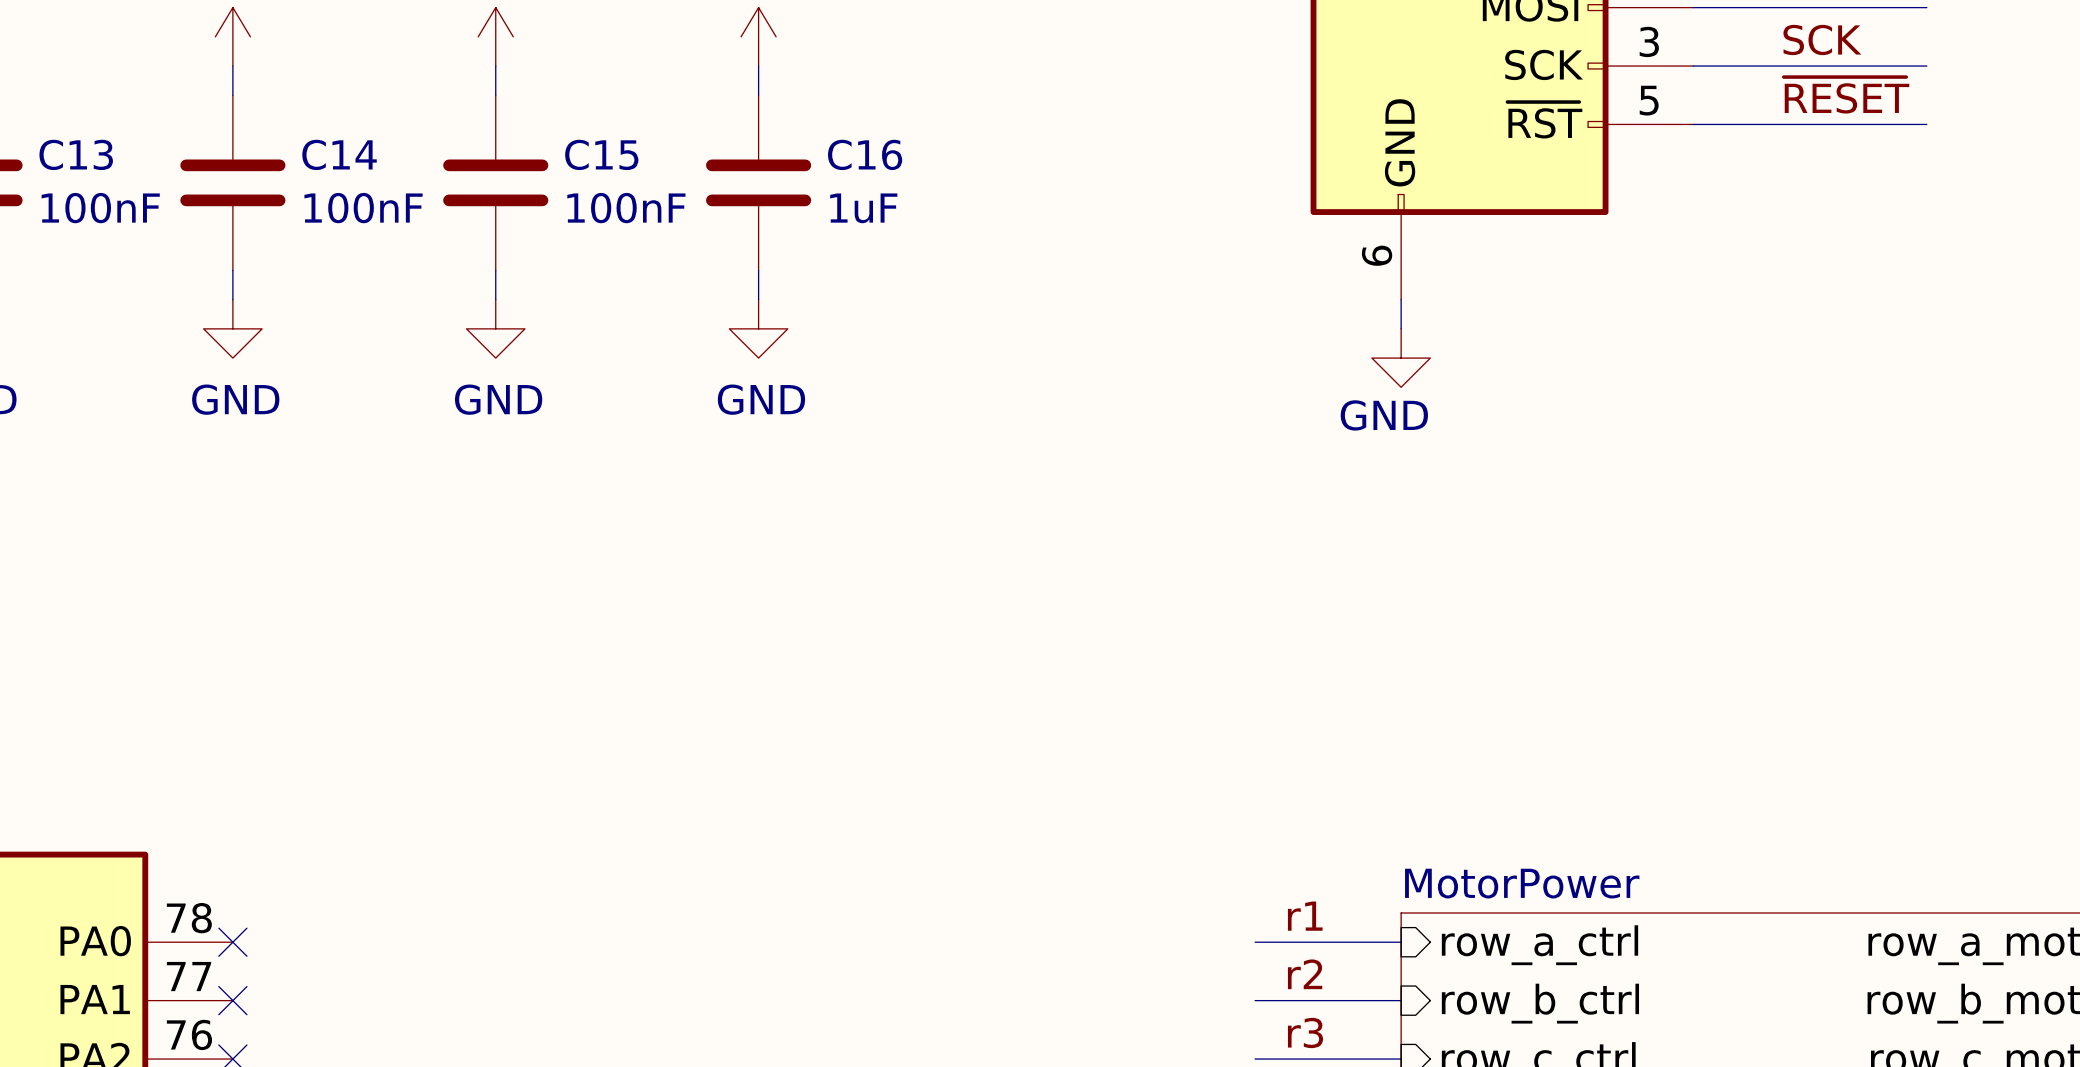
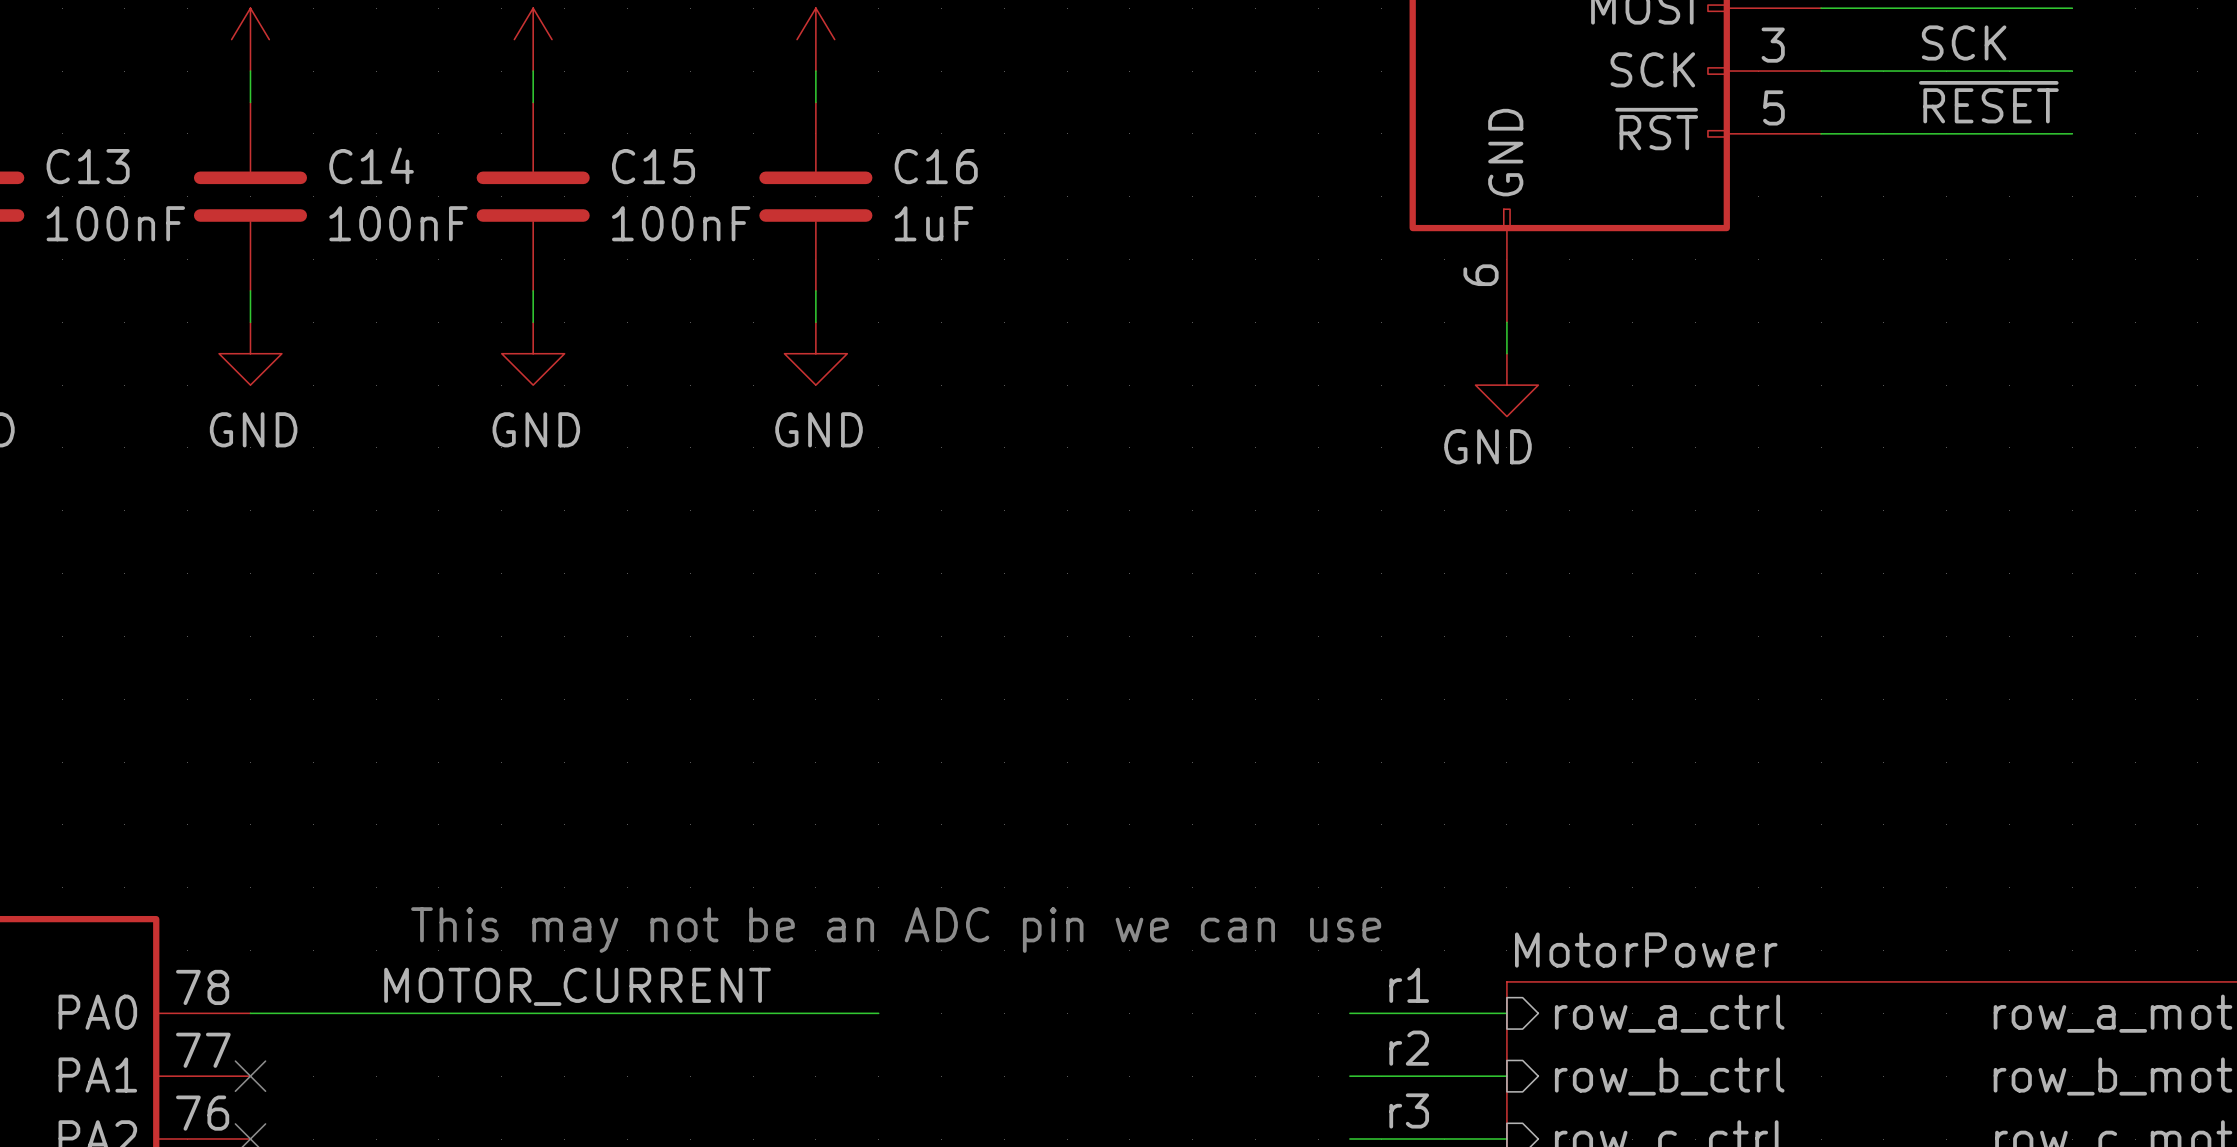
text: none -> This may not be an ADC pin we can use (896, 930)
label: none -> MOTOR_CURRENT (577, 986)
wire: none -> (250, 1013) (878, 1013)
no-connect mark: (232, 942) -> none

